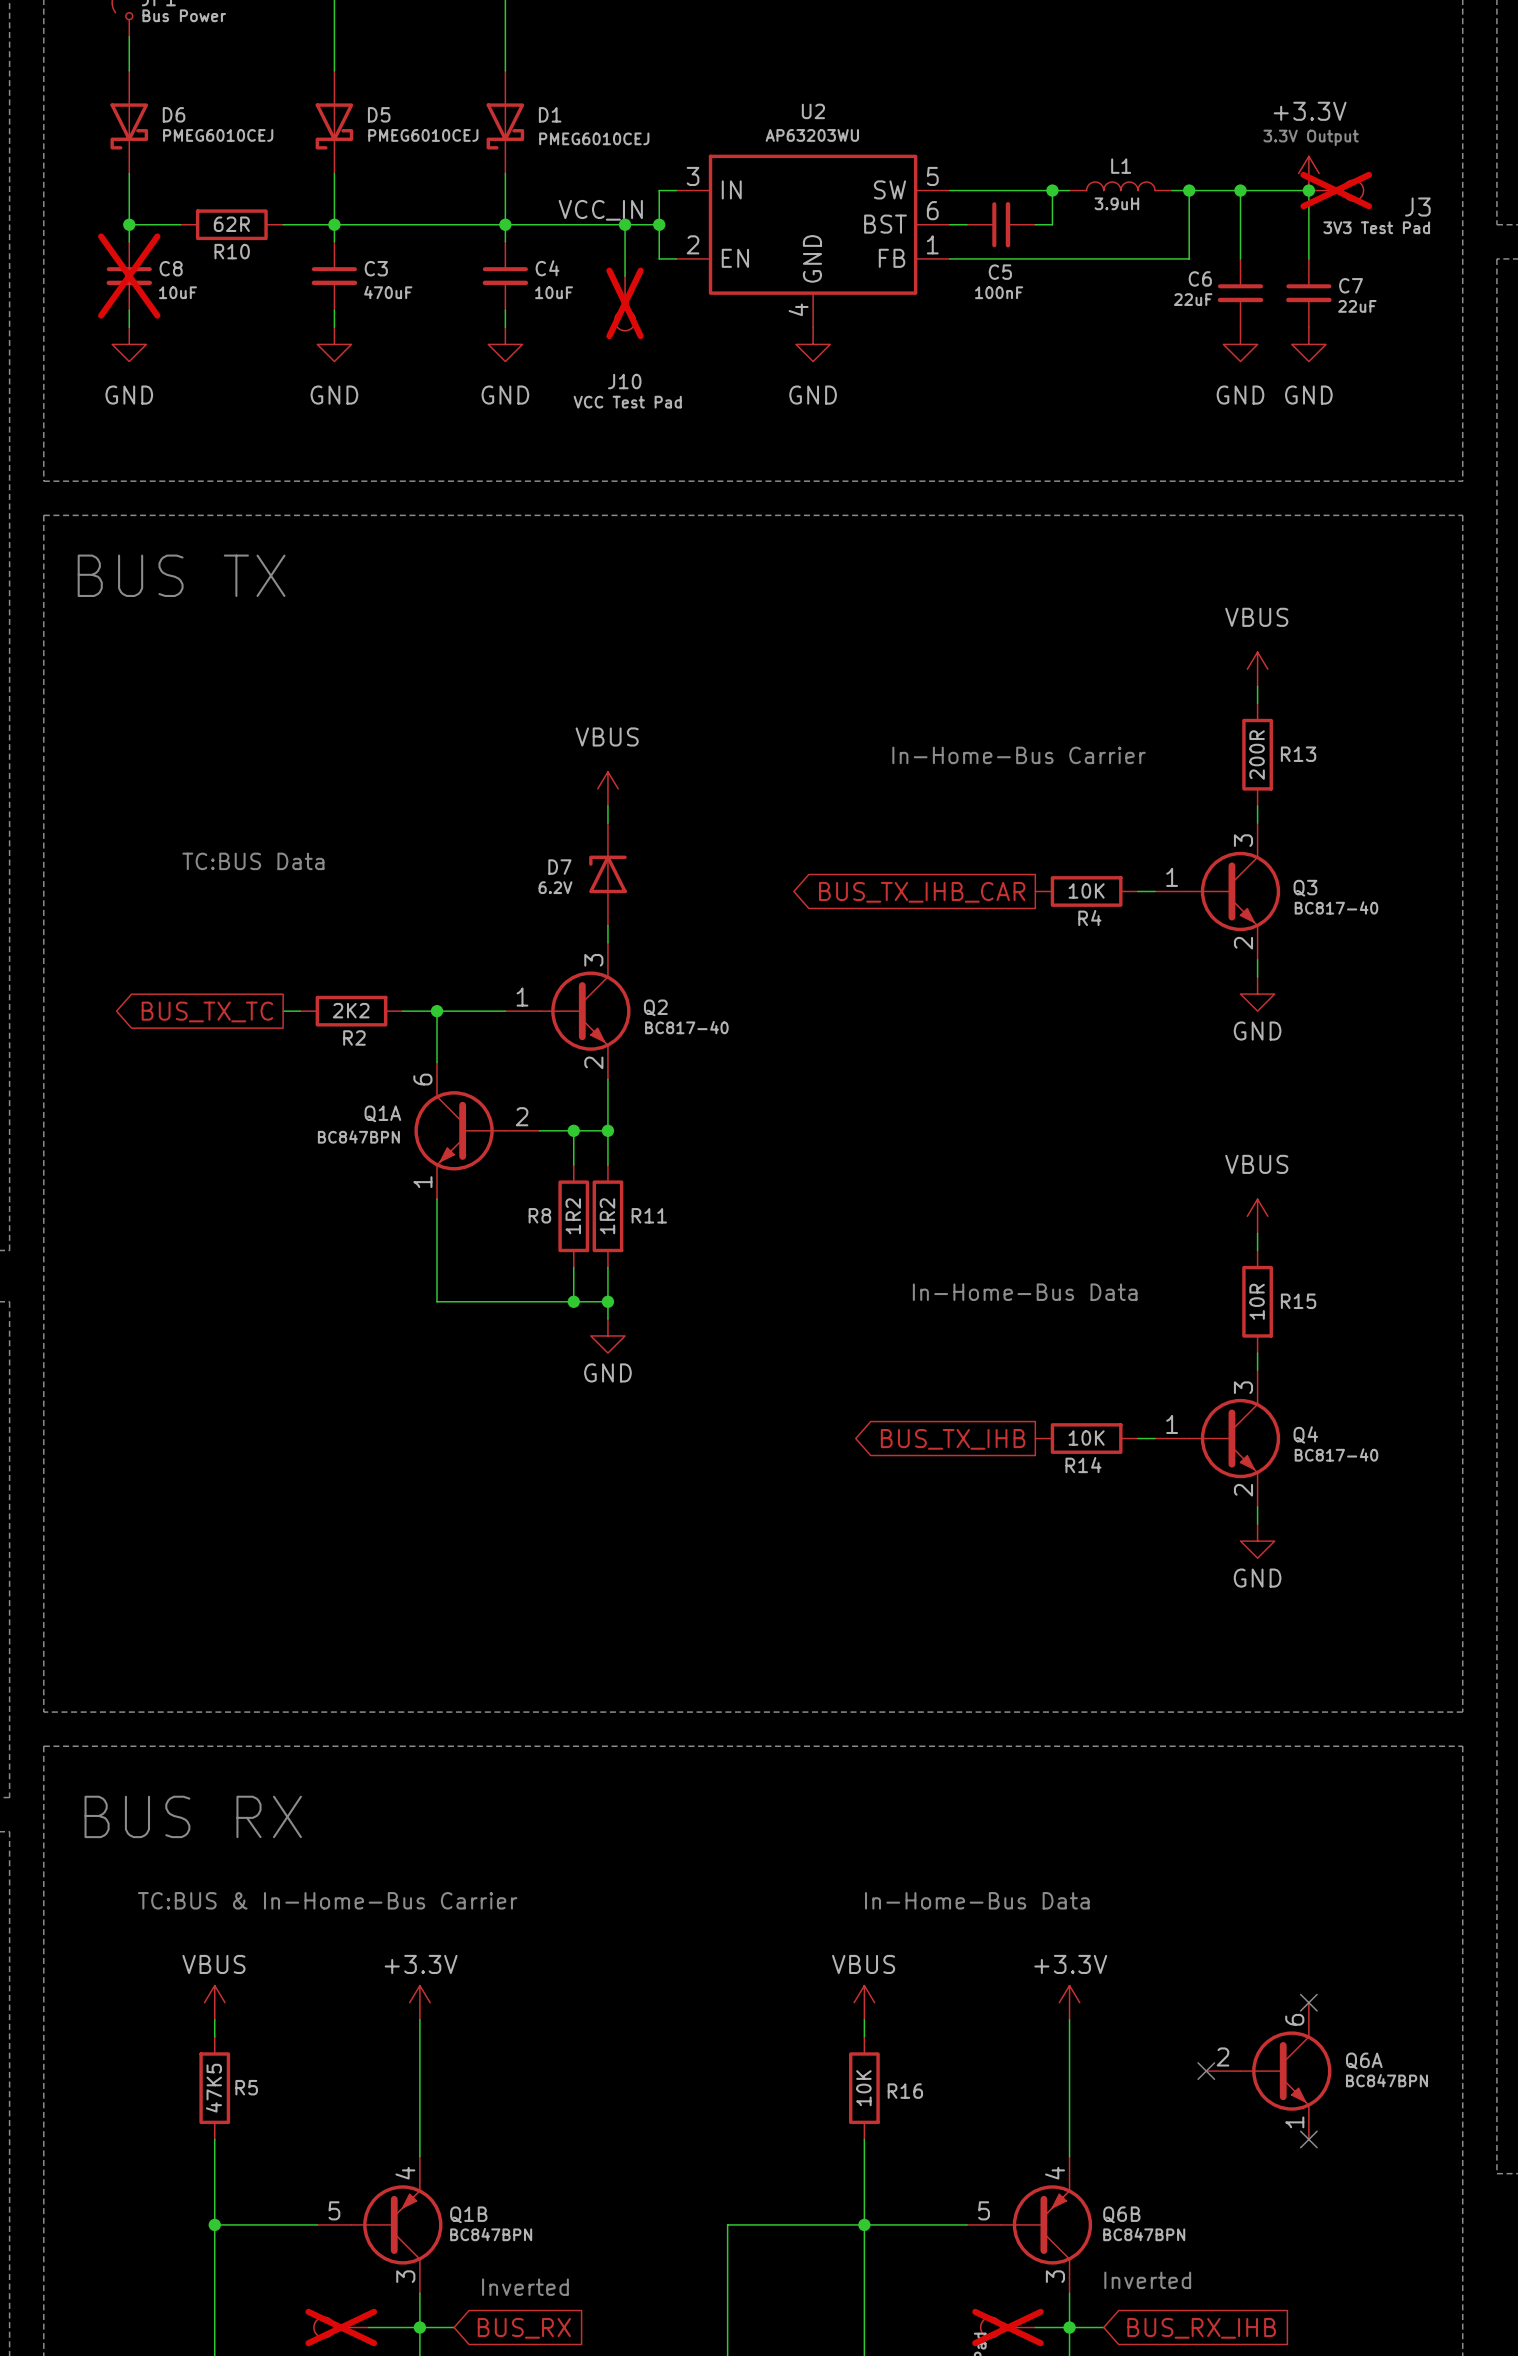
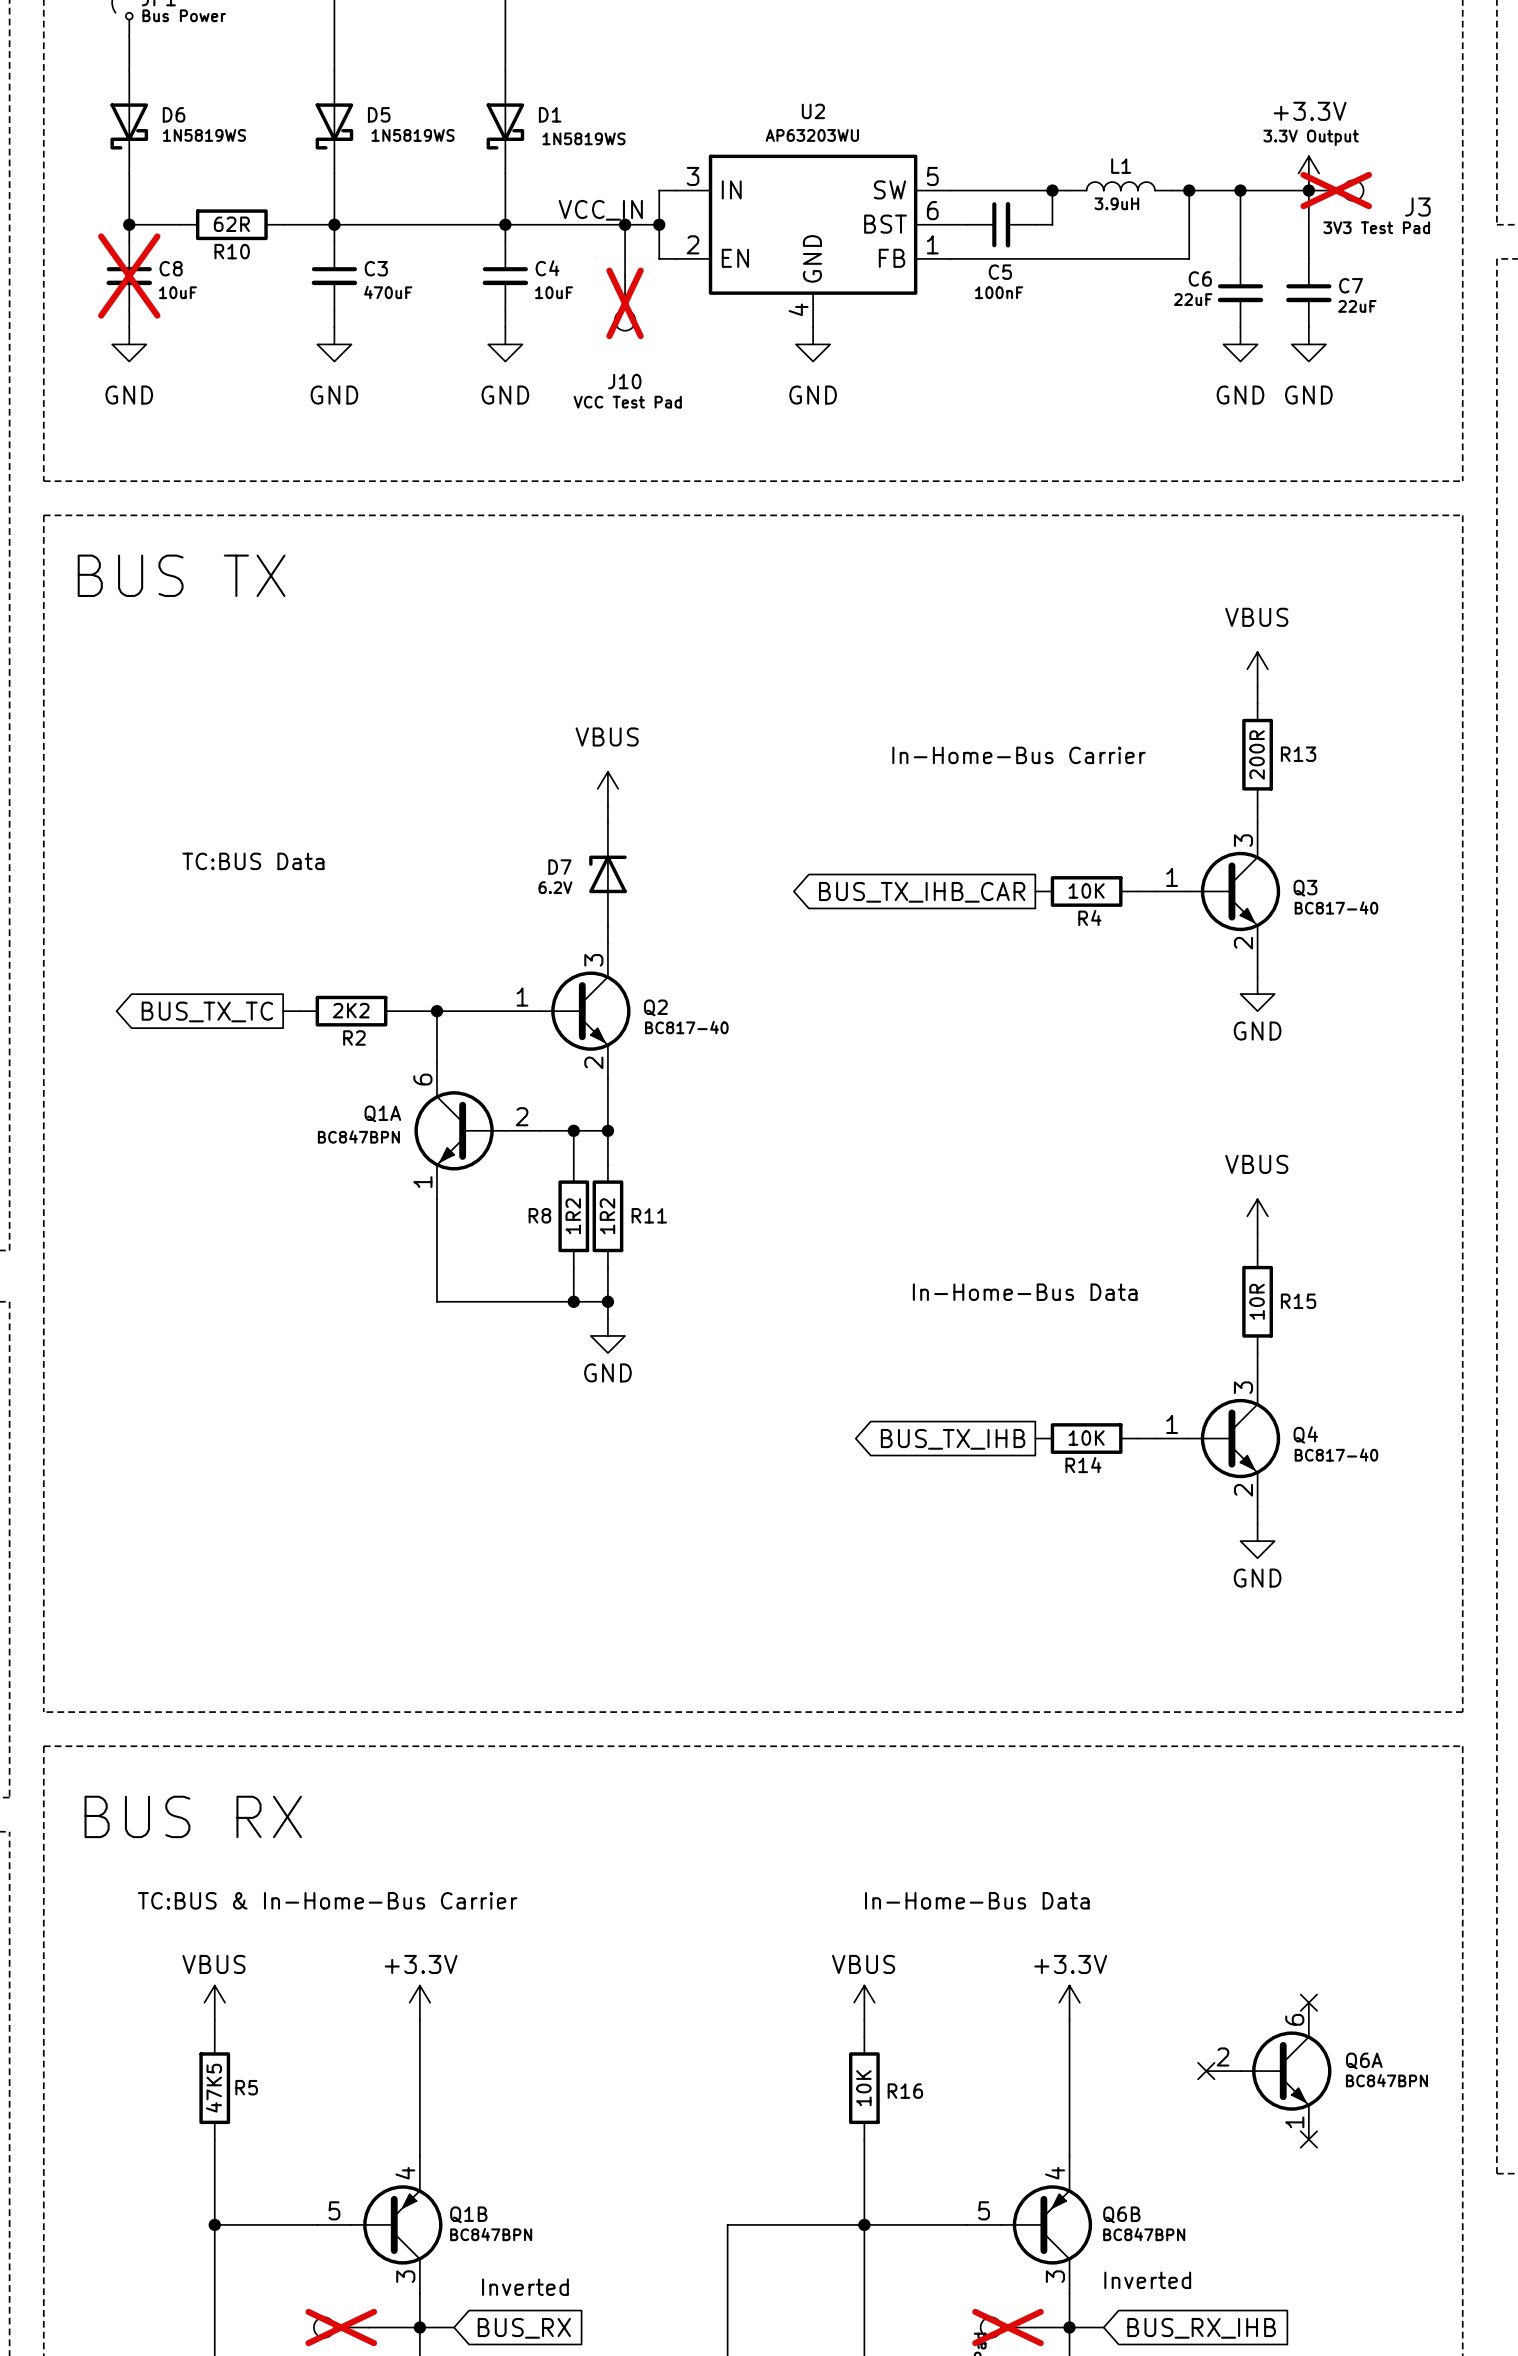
D6 value: PMEG6010CEJ (218, 135) -> 1N5819WS (204, 135)
D5 value: PMEG6010CEJ (423, 135) -> 1N5819WS (413, 135)
D1 value: PMEG6010CEJ (594, 138) -> 1N5819WS (584, 138)

